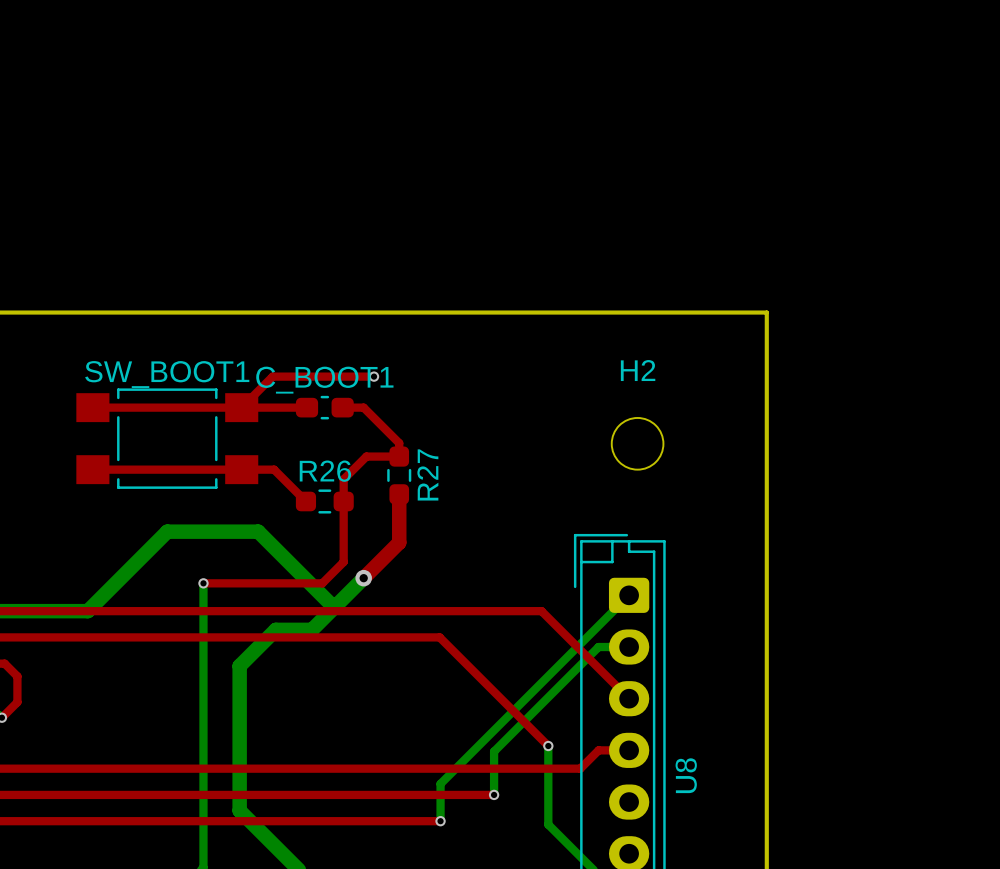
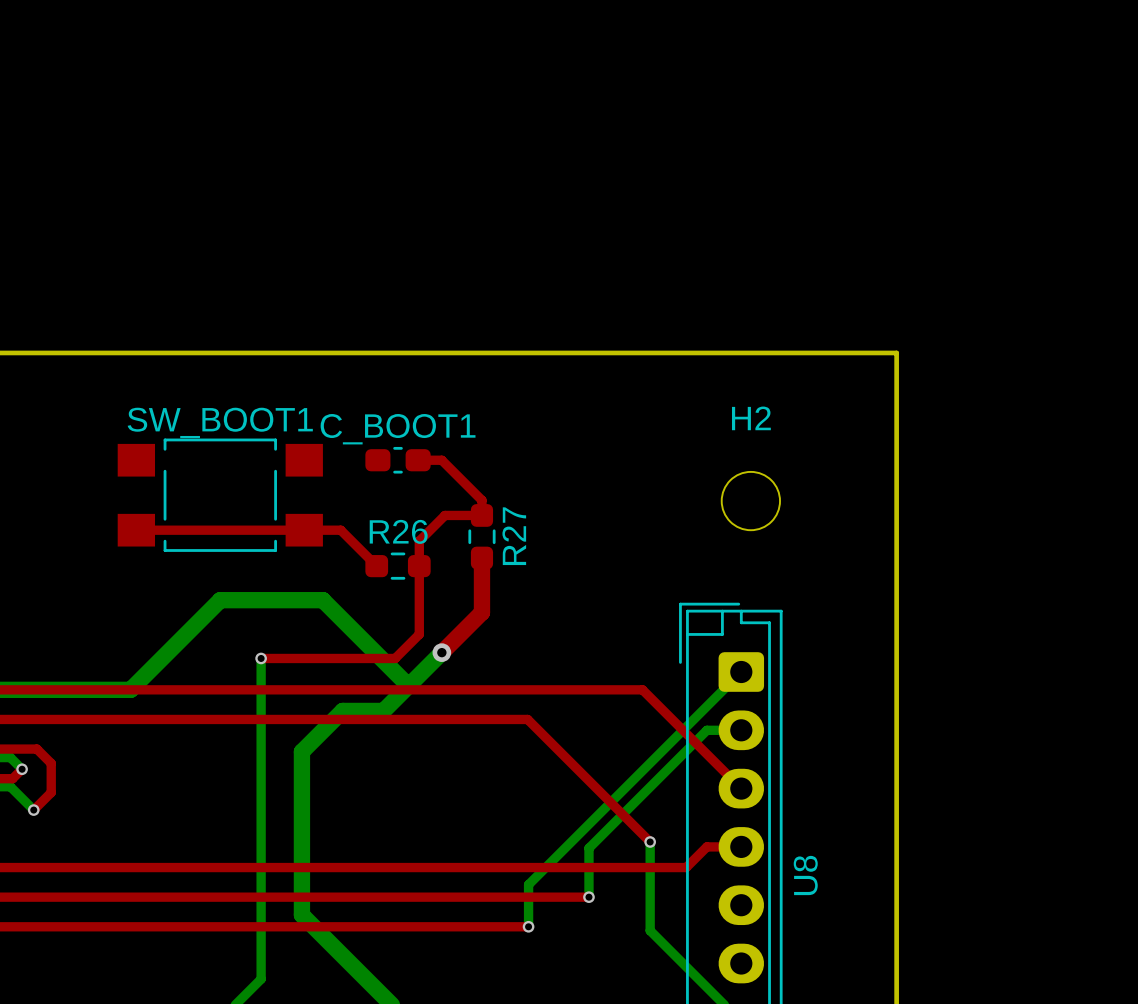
top track: (374, 376) (272, 376) (241, 407) -> none
via: (374, 376) -> none
top track: (92, 407) (306, 407) -> none

